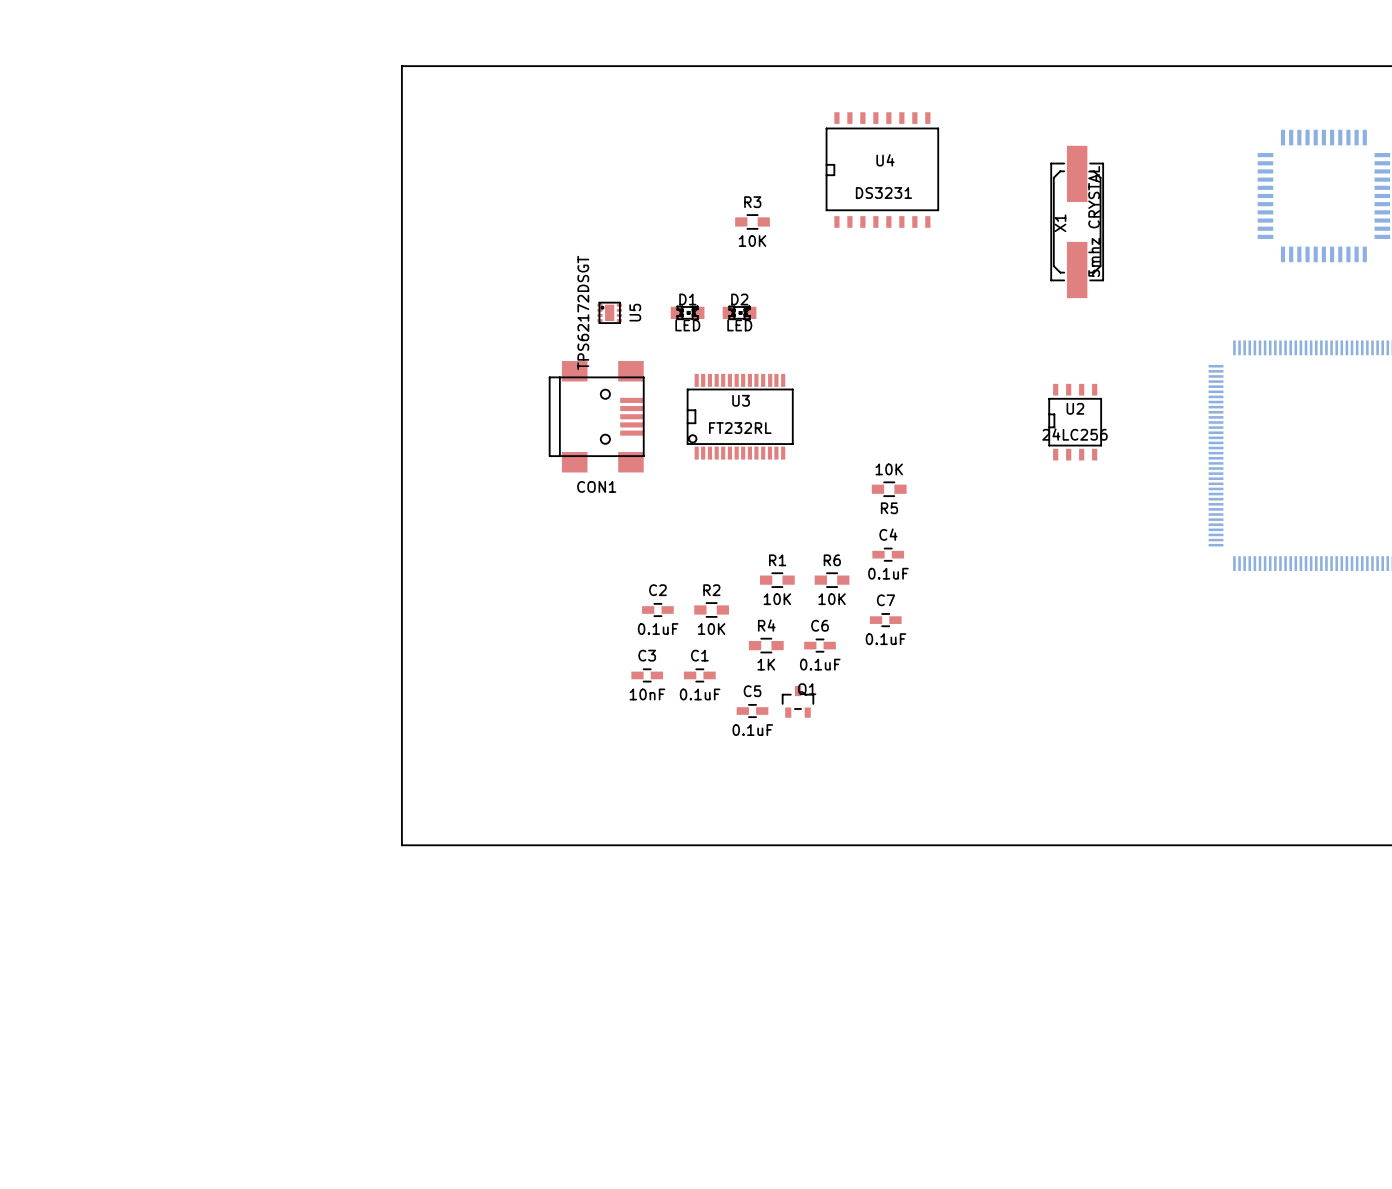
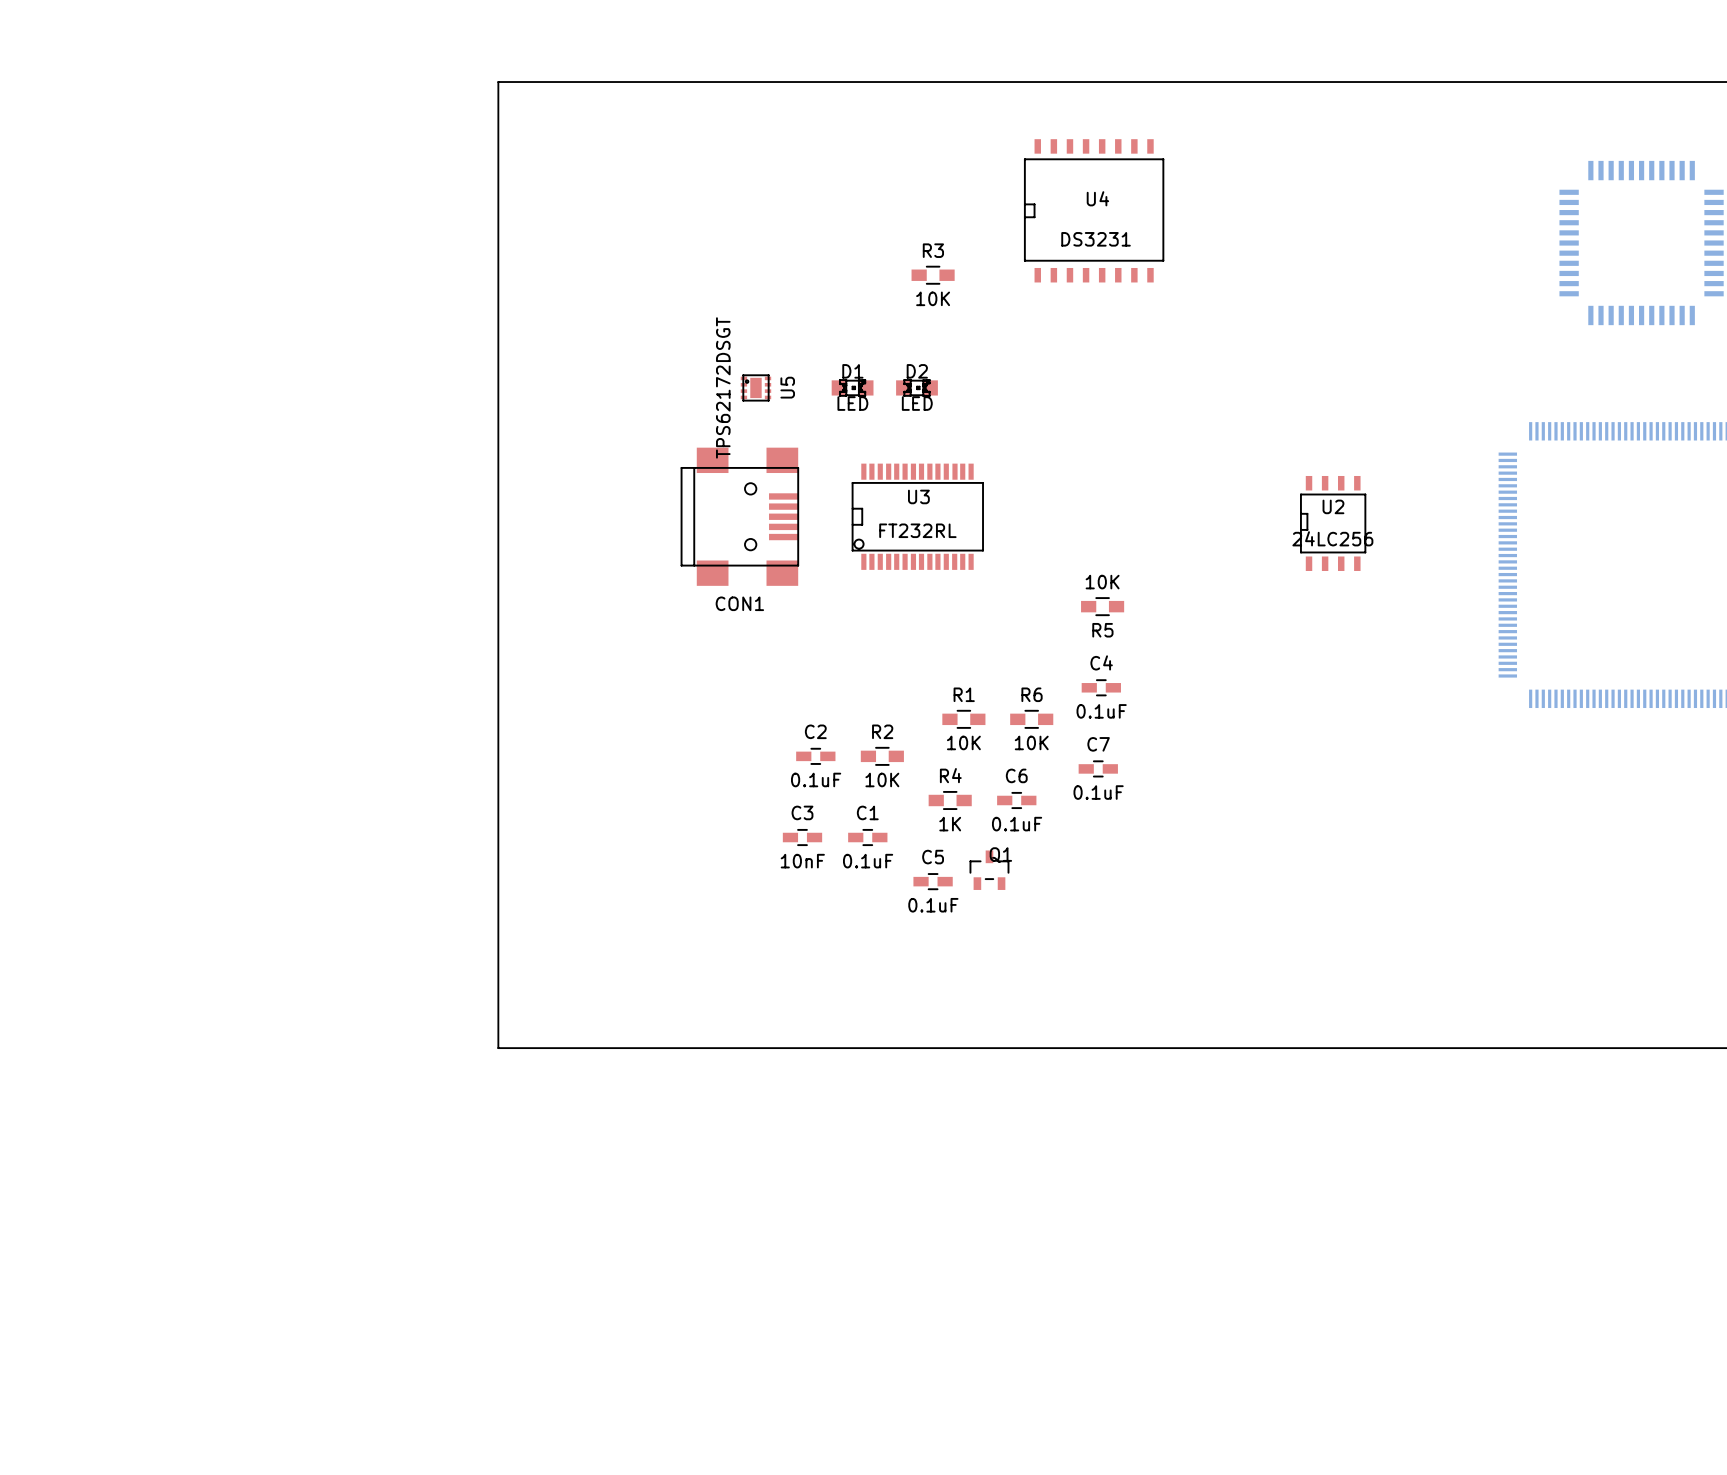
X1: 5mhz CRYSTAL (1077, 221) -> none

